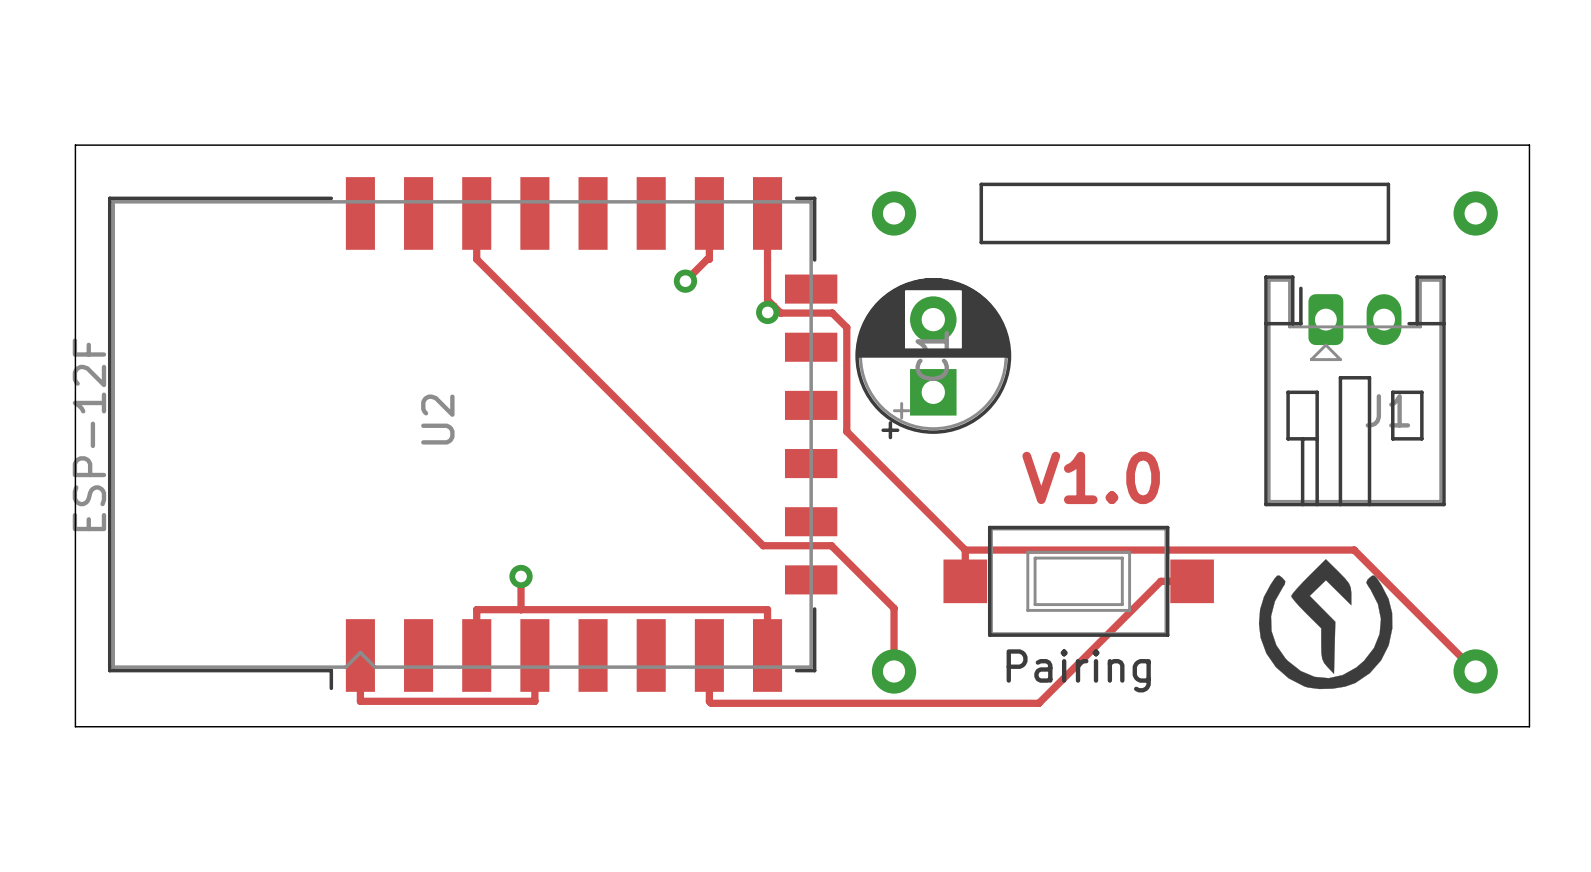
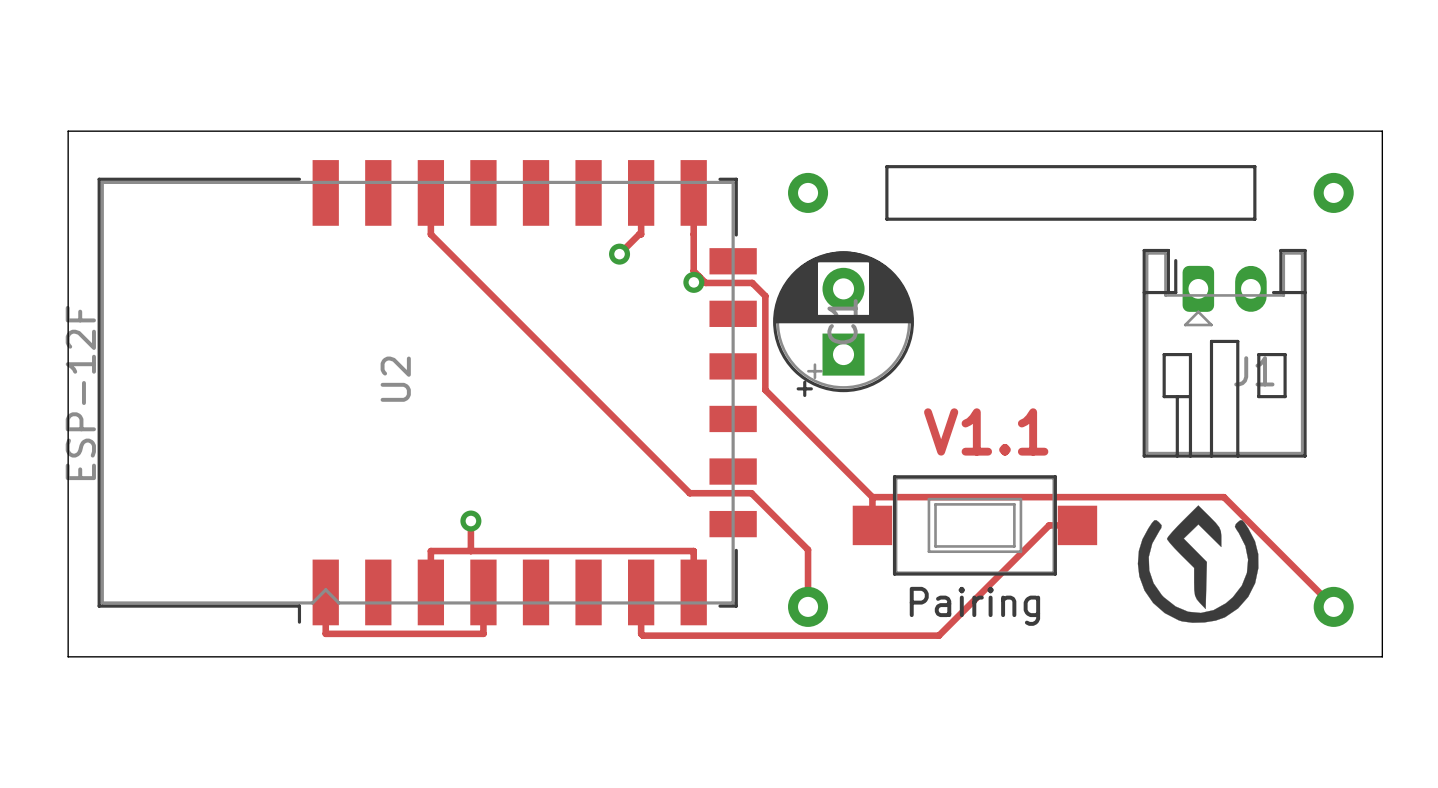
text: V1.0 (1091, 477) -> V1.1 (986, 431)

